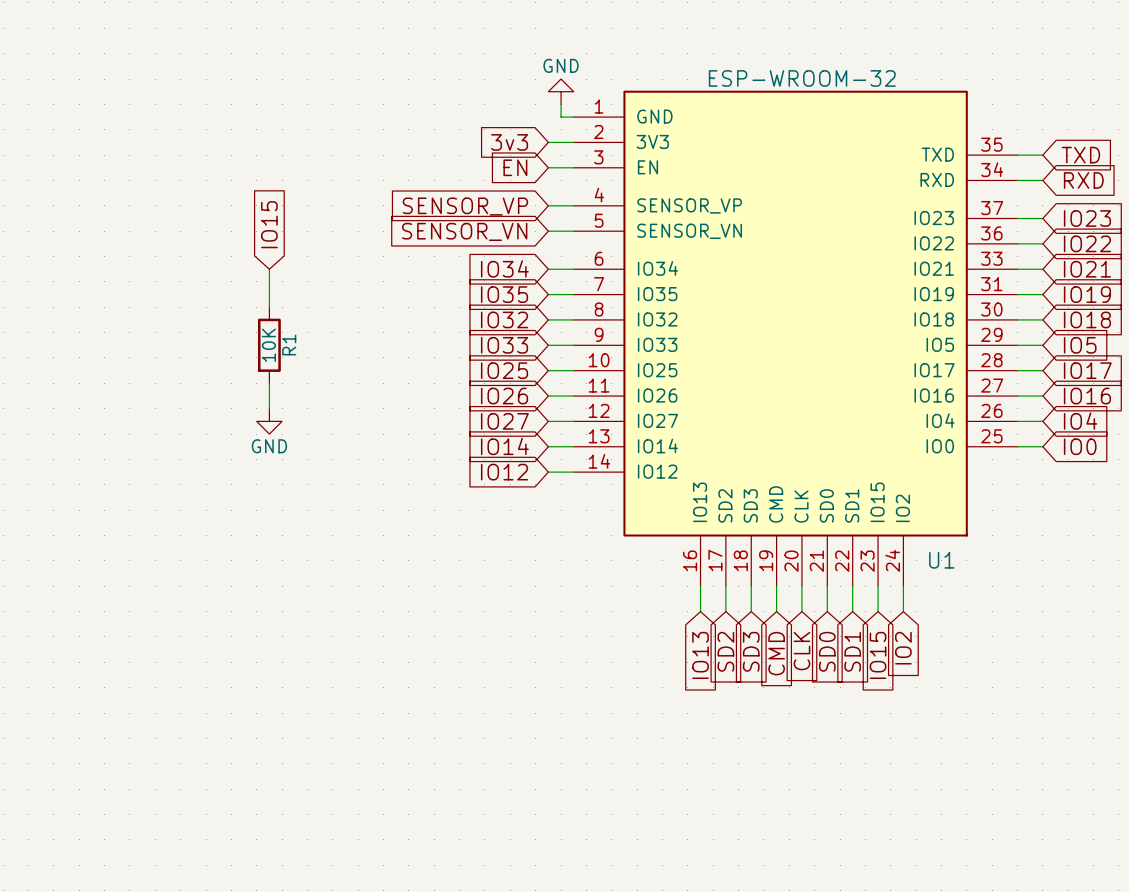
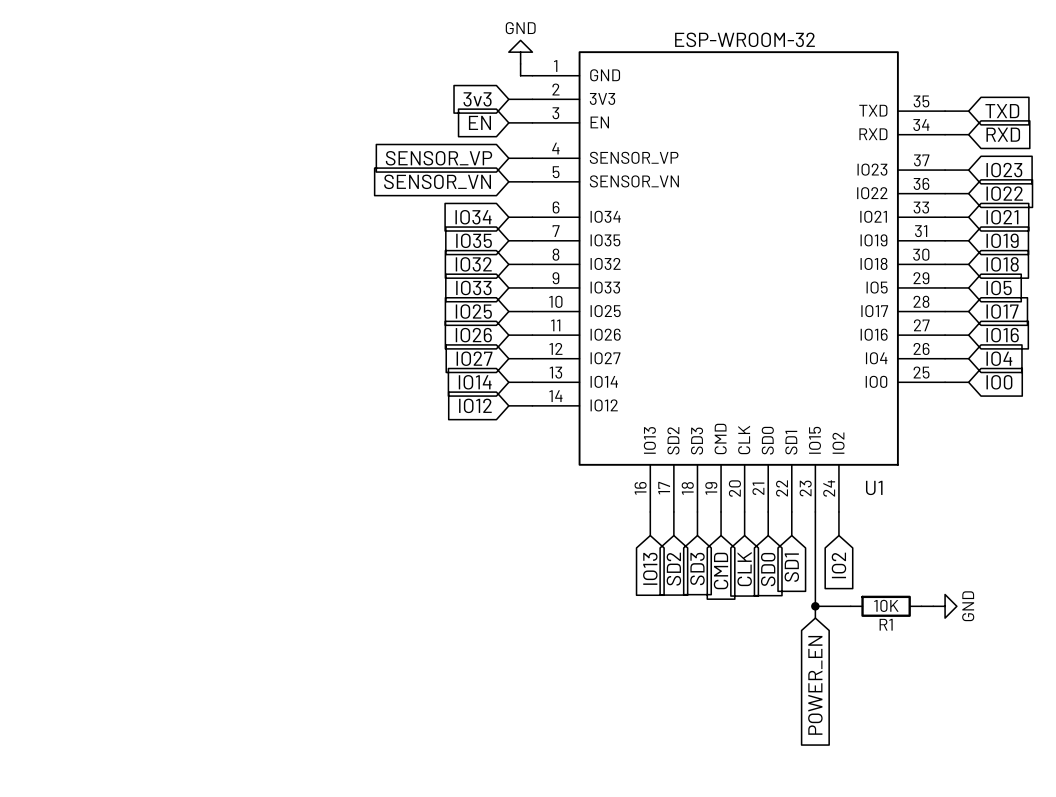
global label: IO15 (269, 224) -> none
wire: (269, 269) (269, 307) -> none
R1 rotation: 0° (269, 345) -> 90° clockwise (886, 606)
R1 position: (269, 345) -> (886, 606)
wire: (269, 383) (269, 408) -> none
power symbol: GND (269, 421) -> none
wire: none -> (815, 535) (815, 618)
global label: IO15 (878, 655) -> none
wire: none -> (815, 606) (850, 606)
junction: none -> (815, 606)
wire: none -> (921, 606) (933, 606)
power symbol: none -> GND (945, 606)
global label: none -> POWER_EN (815, 685)

